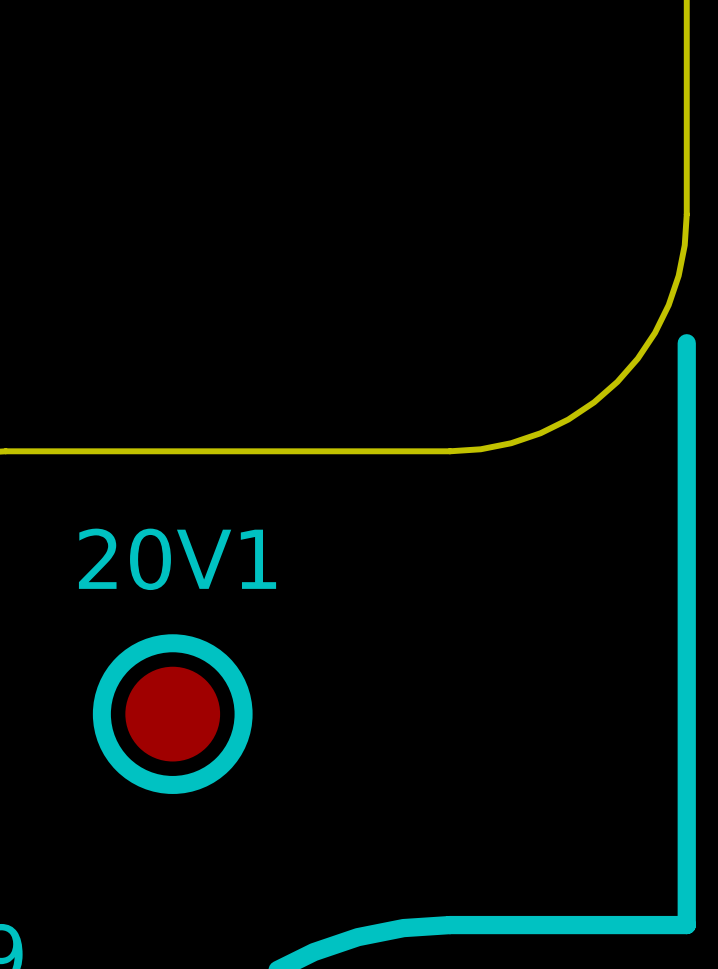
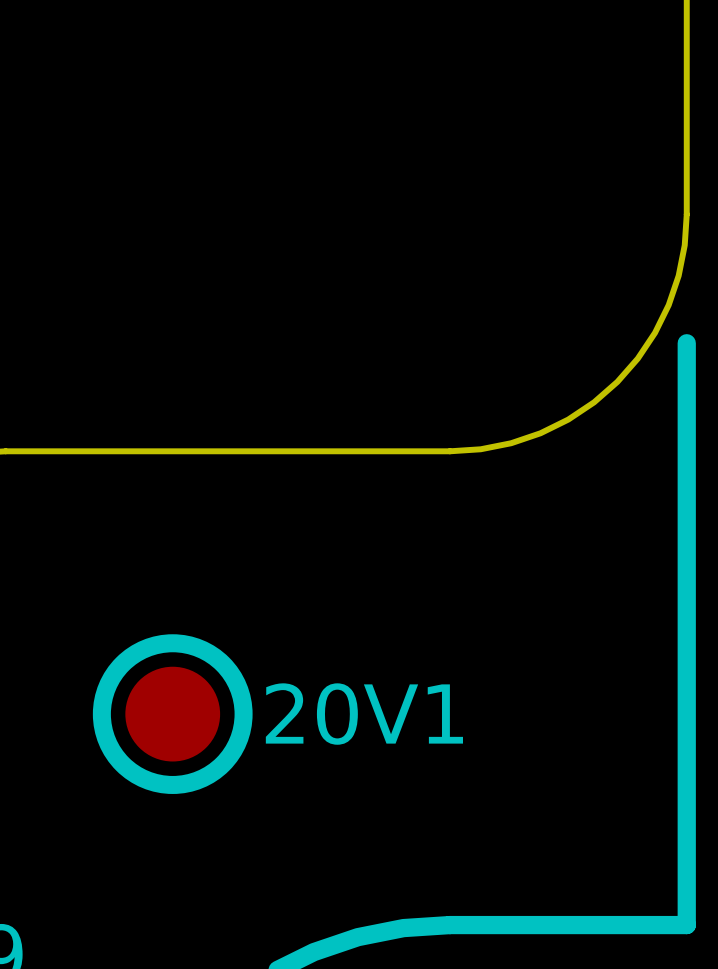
20V1 name position: 20V1 (177, 559) -> 20V1 (364, 714)

